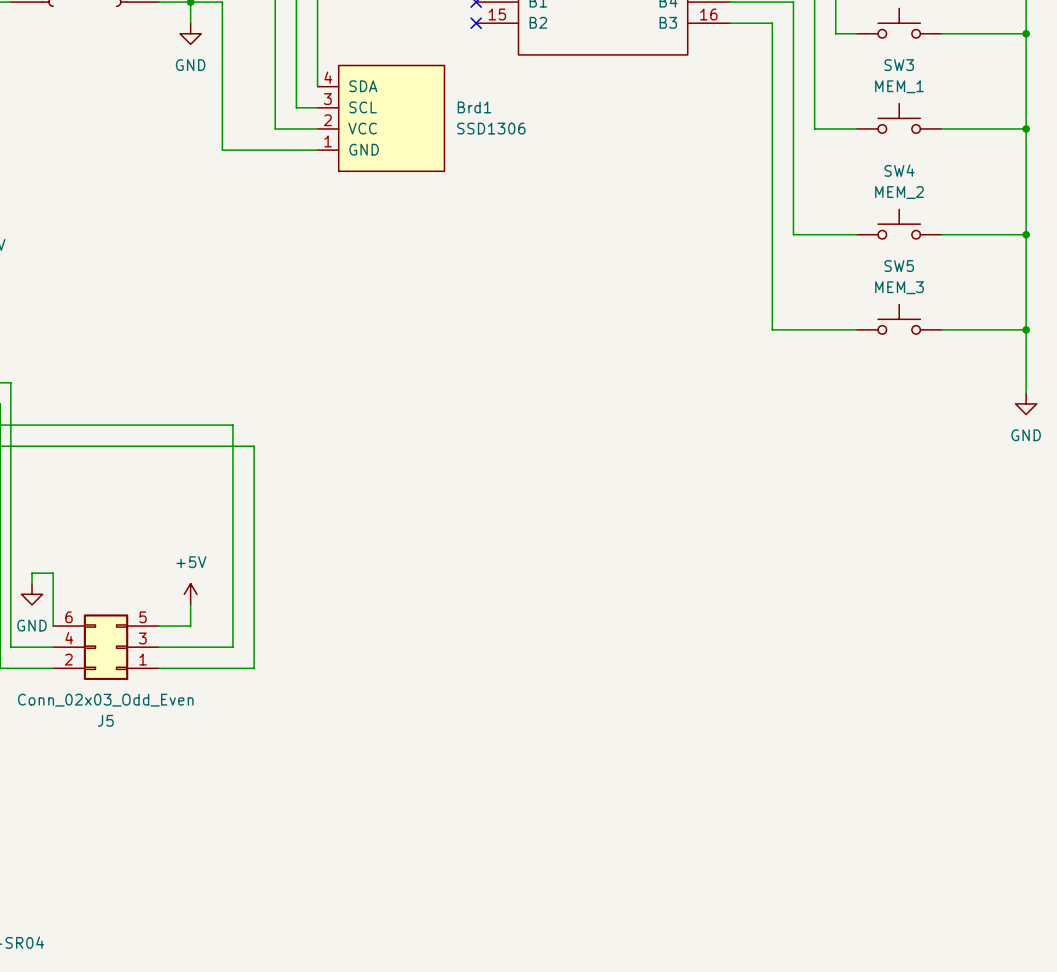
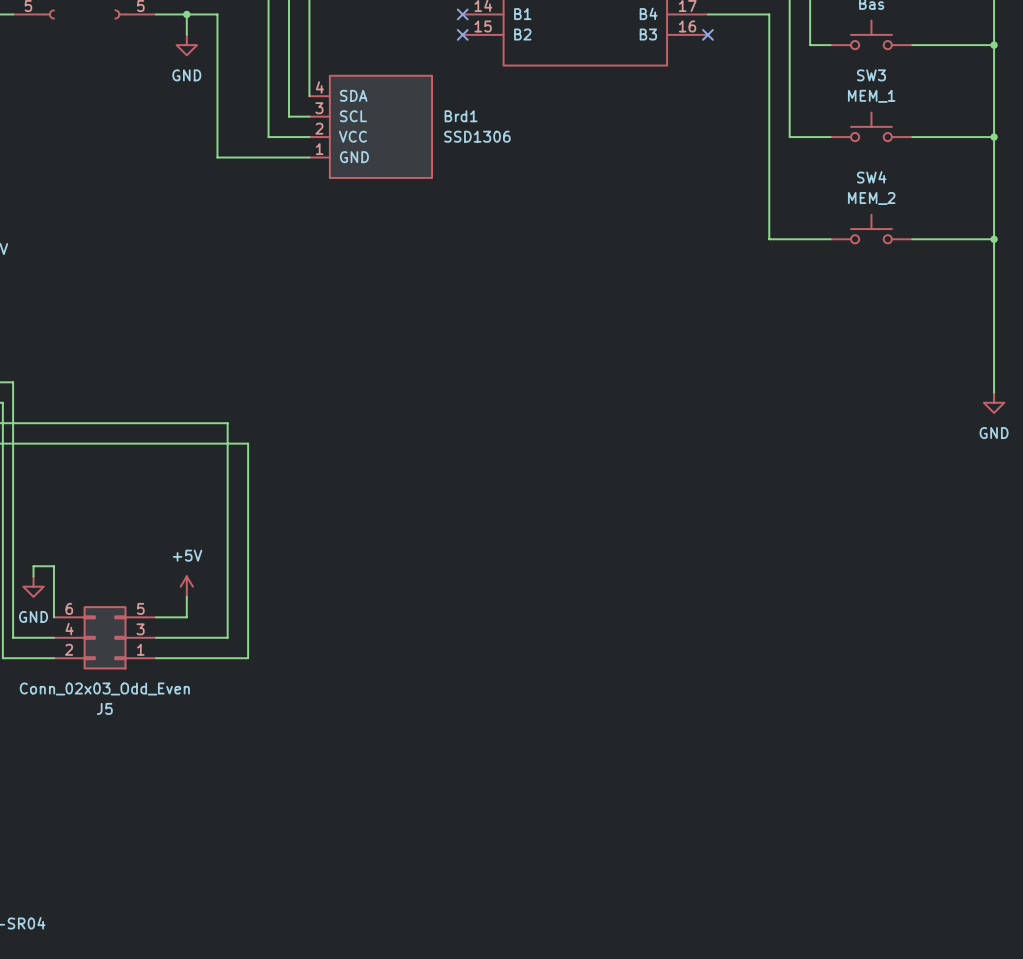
wire: (730, 23) (772, 23) (772, 329) (856, 329) -> none
no-connect mark: none -> (707, 34)
SW5: MEM_3 (899, 319) -> none
wire: (941, 329) (1026, 329) -> none
junction: (1026, 329) -> none

